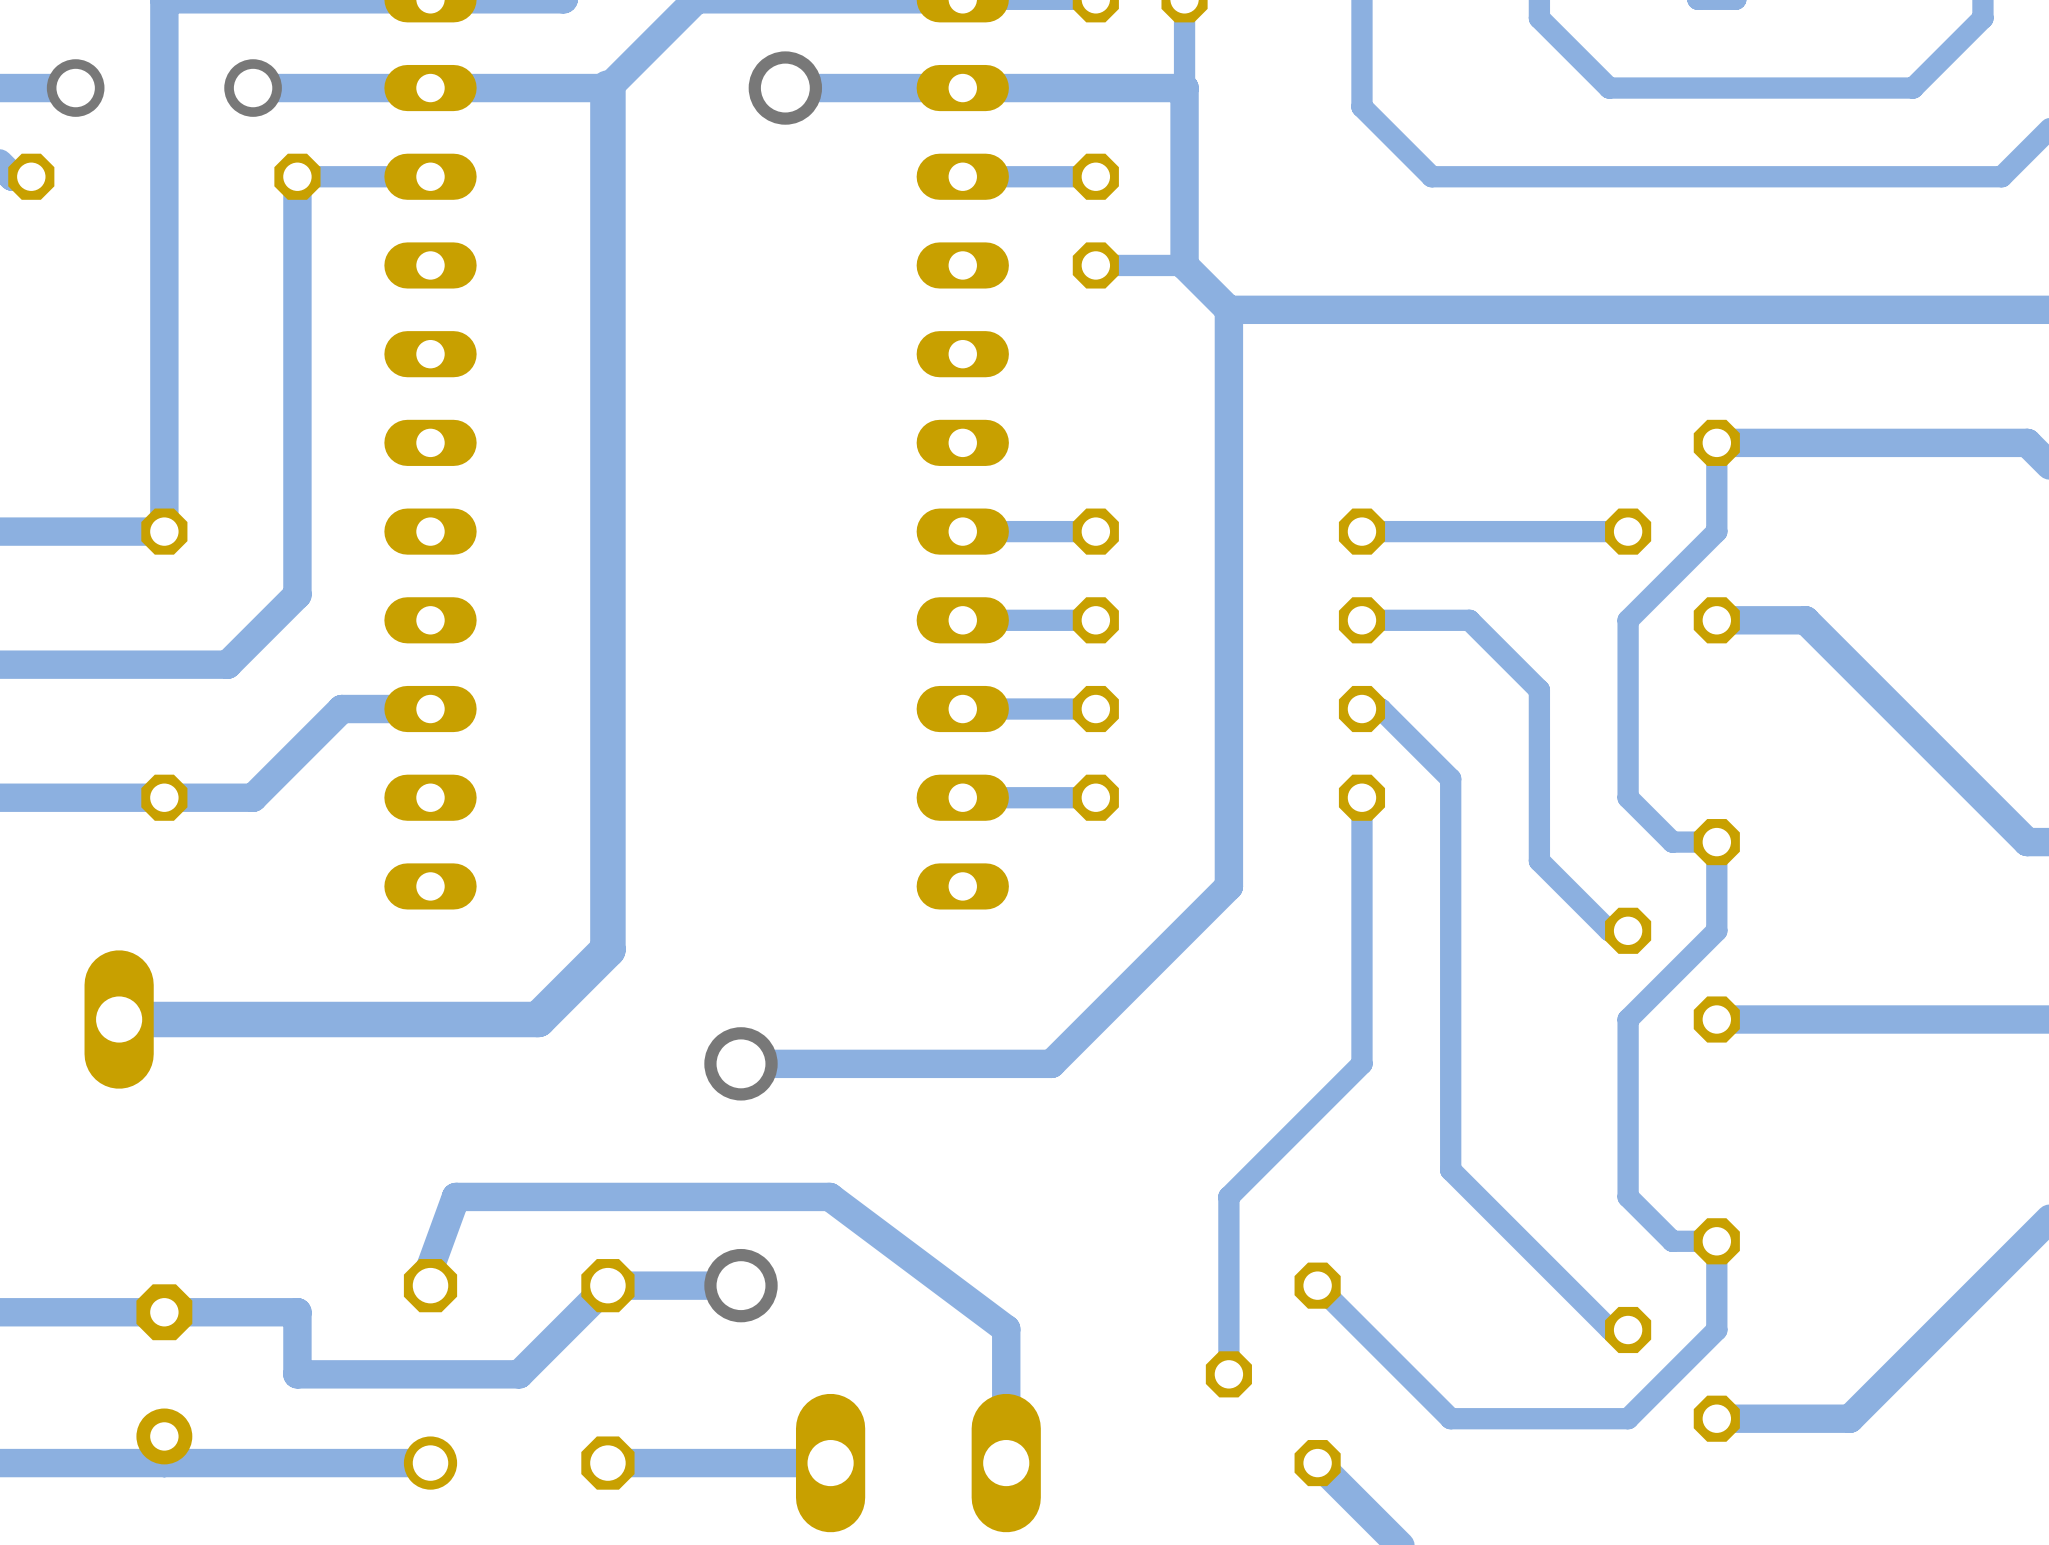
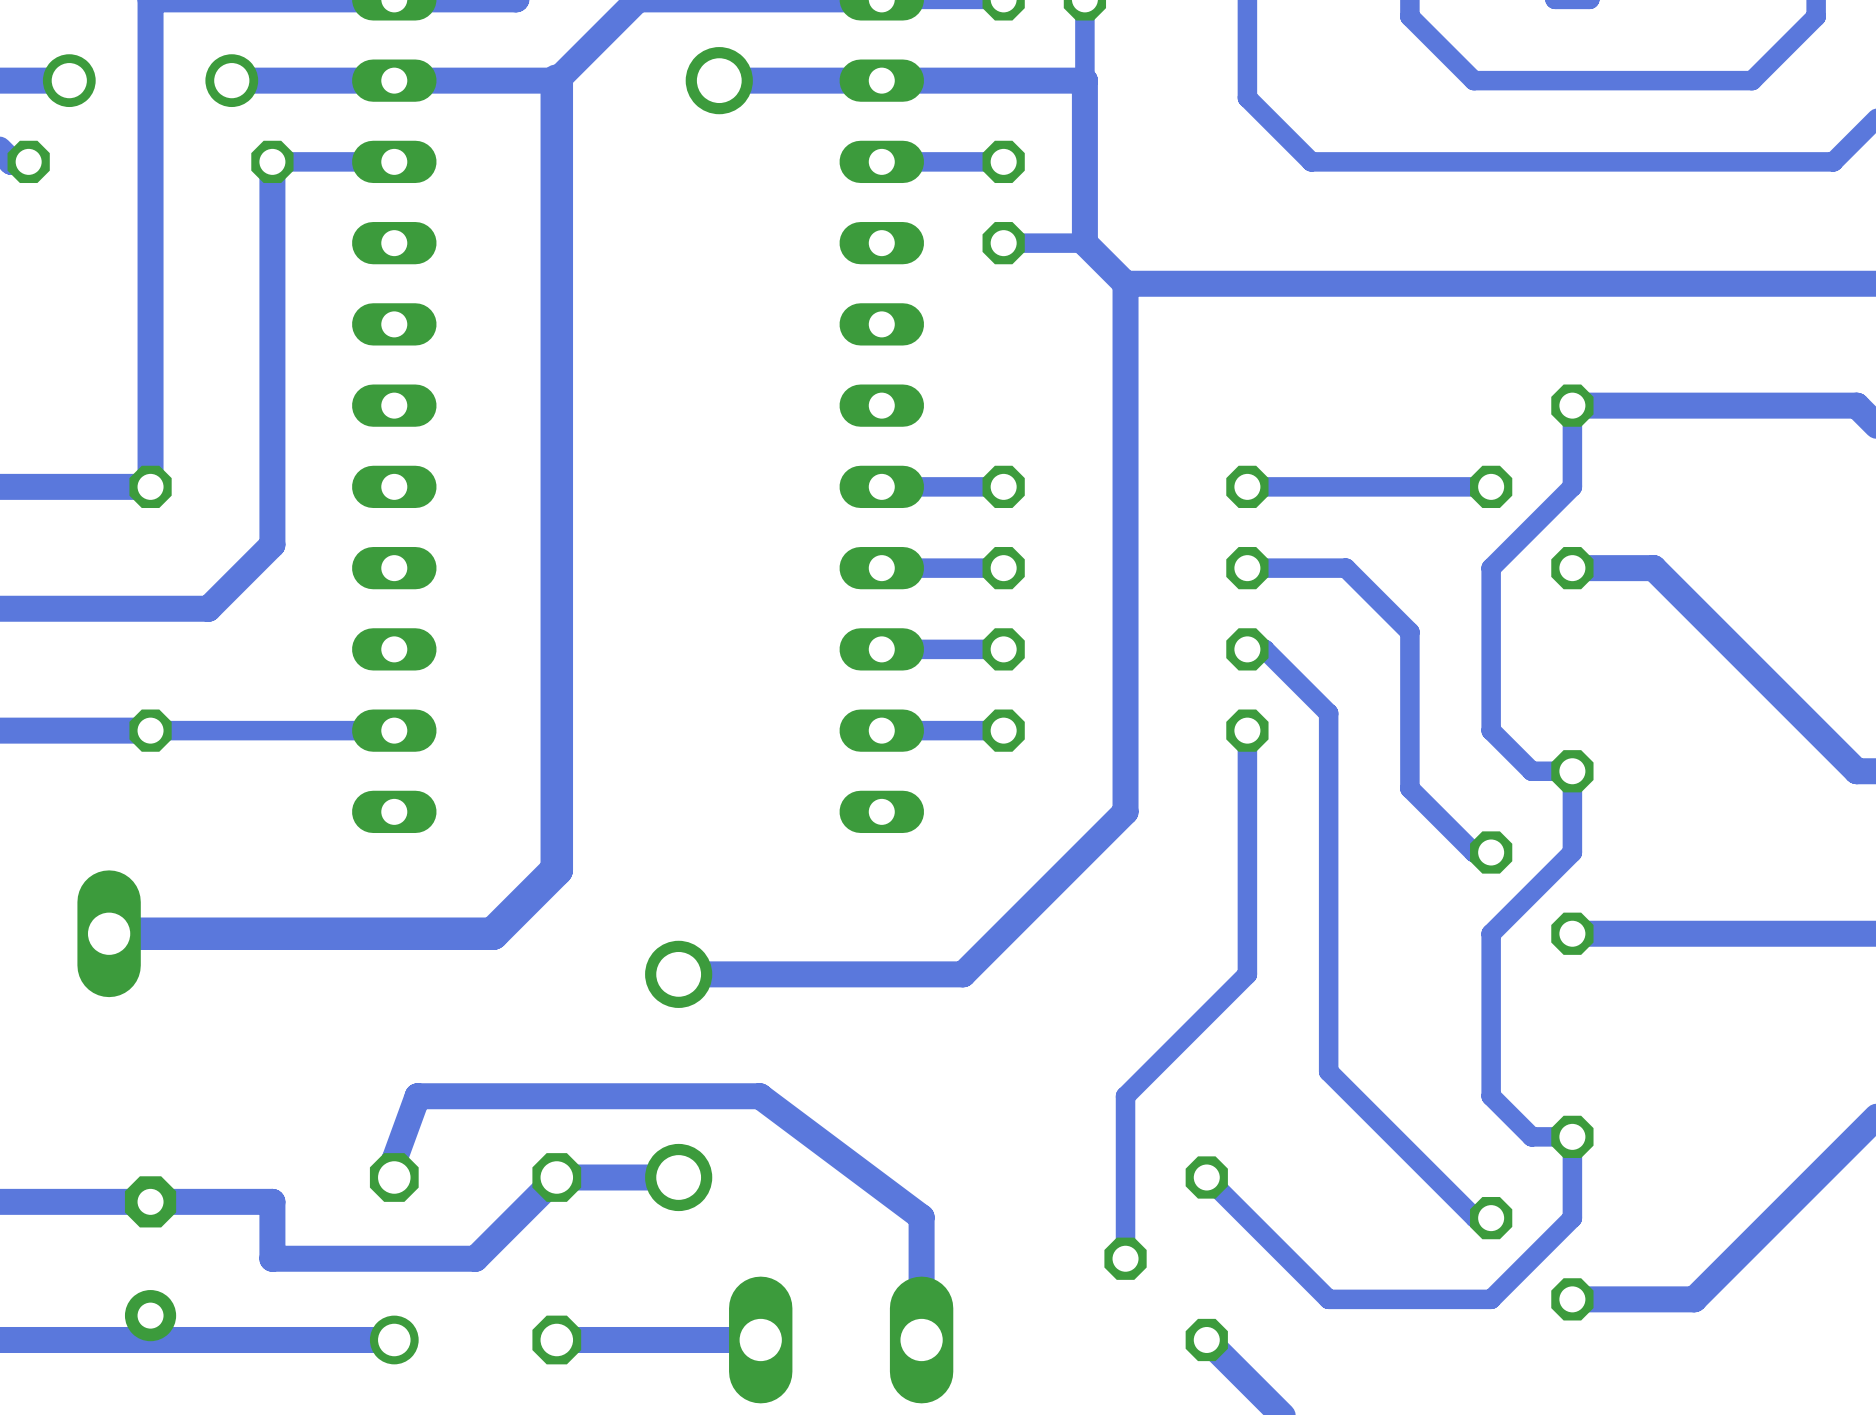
bottom track: (430, 709) (341, 709) (253, 797) -> (394, 730) (231, 730)
bottom track width: thick (253, 797) (164, 797) -> thin (231, 730) (150, 730)

